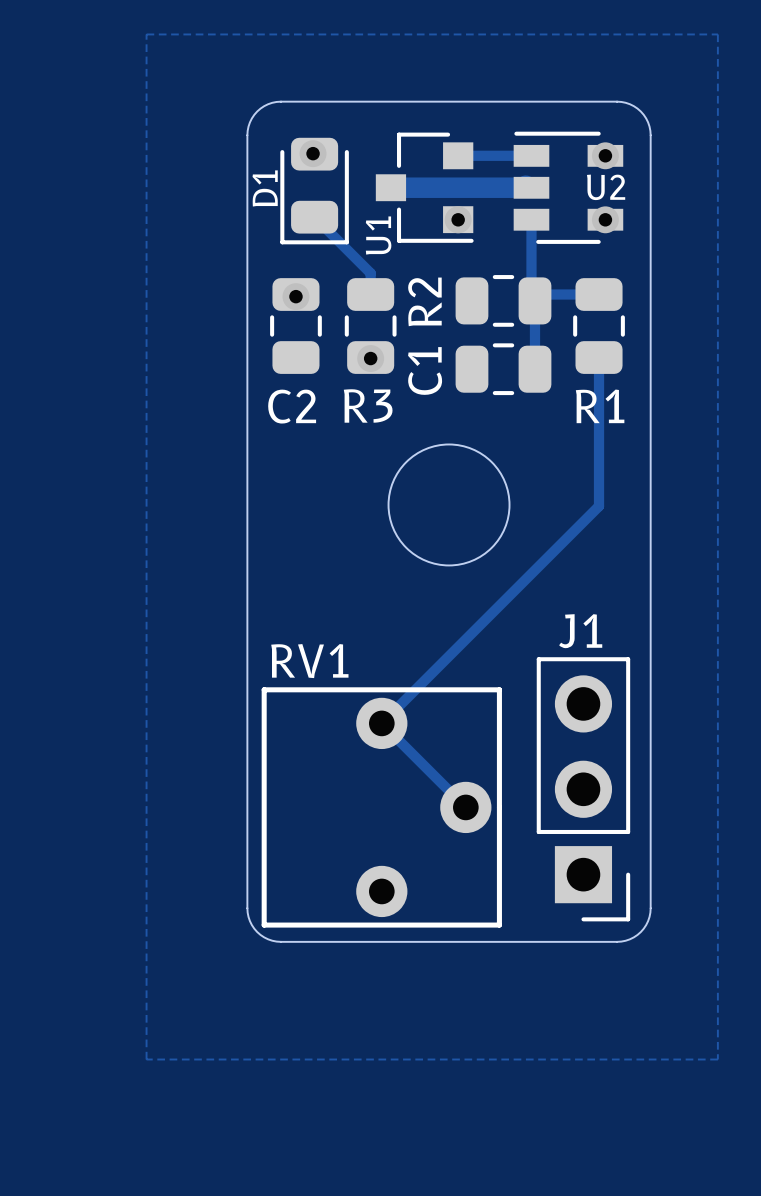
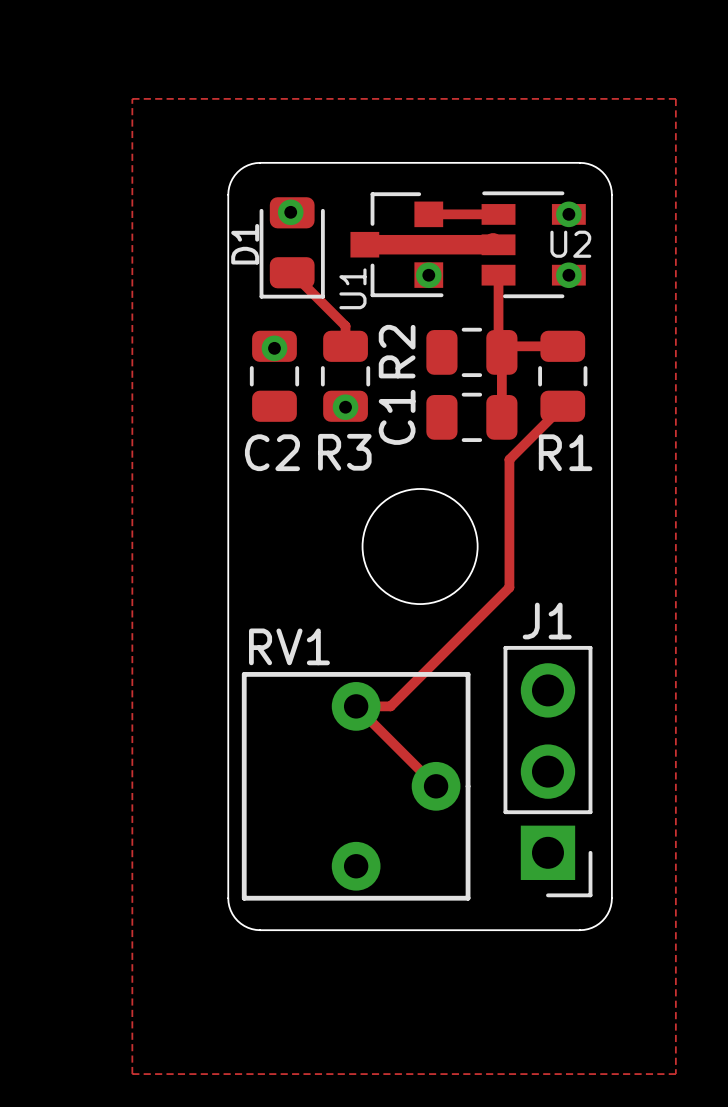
track: (599, 357) (599, 506) (381, 723) (465, 807) -> (562, 406) (509, 459) (509, 587) (390, 706) (356, 706) (436, 786)
J1 position: (583, 789) -> (547, 771)
RV1 position: (381, 807) -> (356, 786)
board edge: (247, 874) (247, 912) (251, 925) (264, 937) (280, 941) (621, 941) (637, 934) (648, 921) (650, 908) (650, 874) -> (228, 898) (230, 910) (237, 920) (247, 927) (260, 930) (584, 929) (595, 925) (605, 917) (610, 906) (611, 898)

